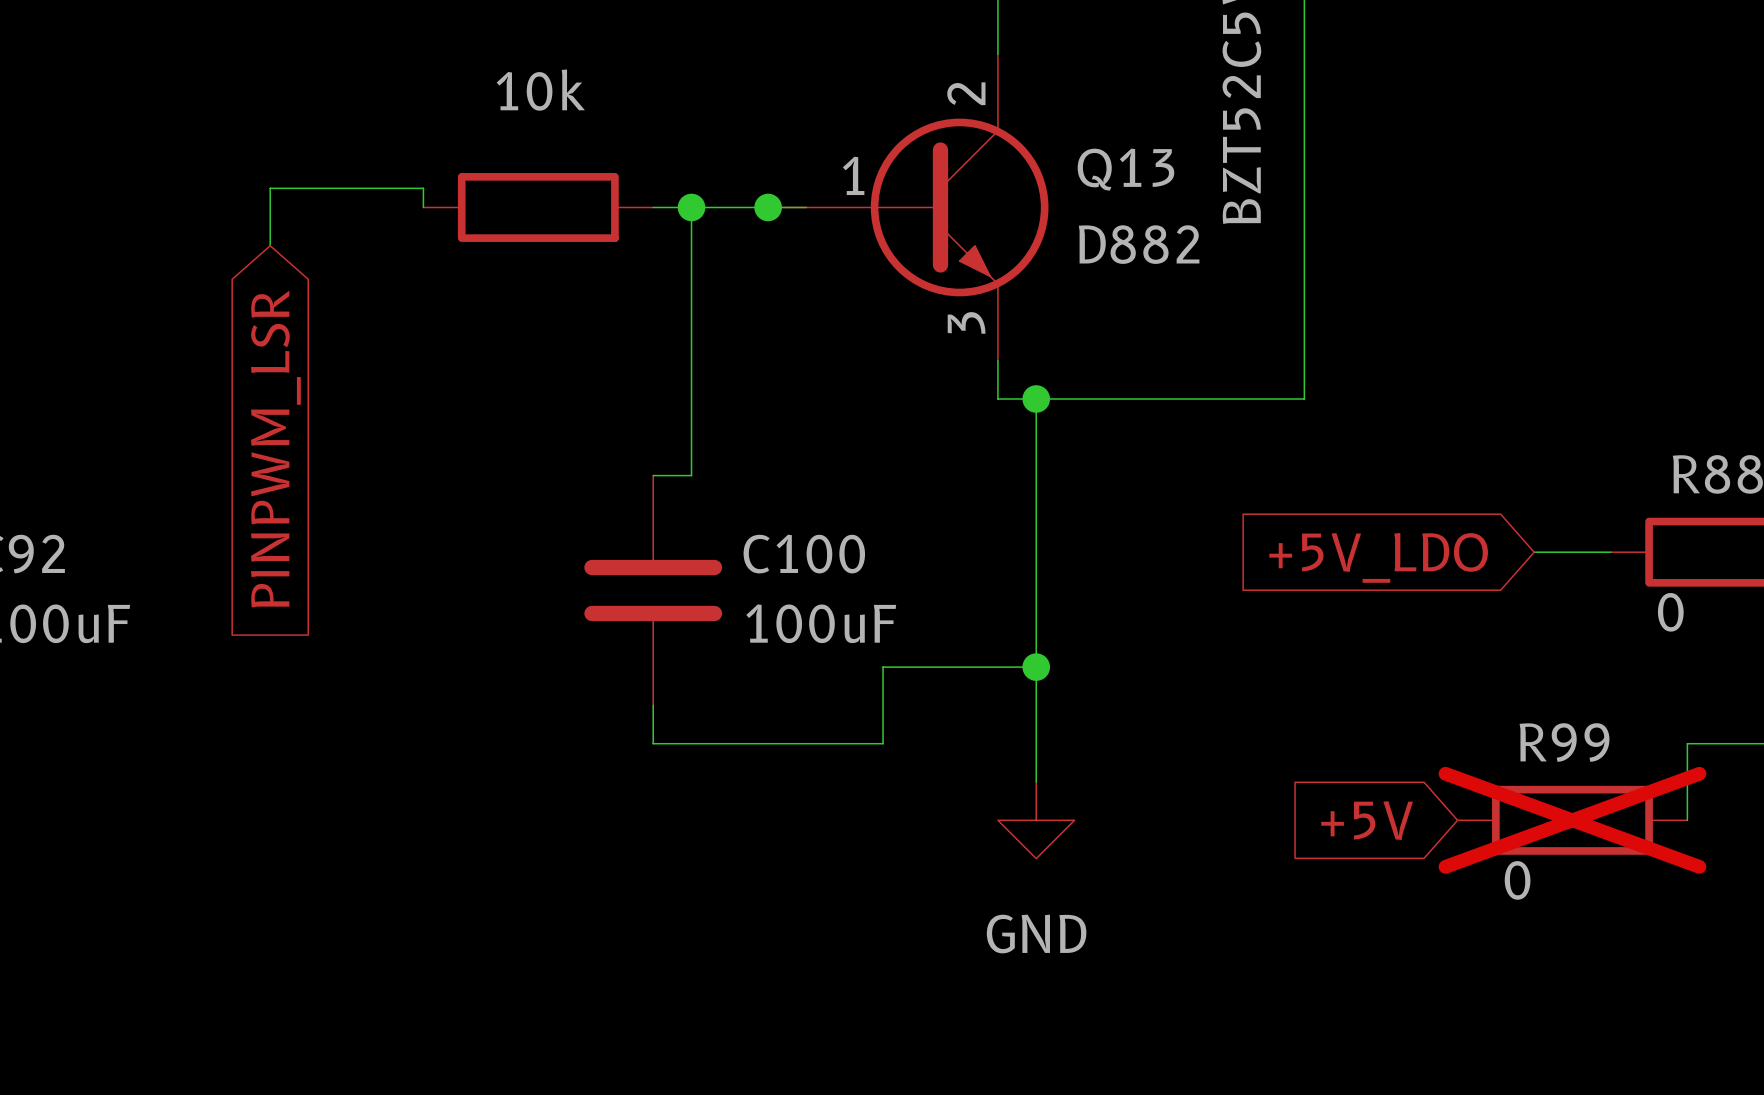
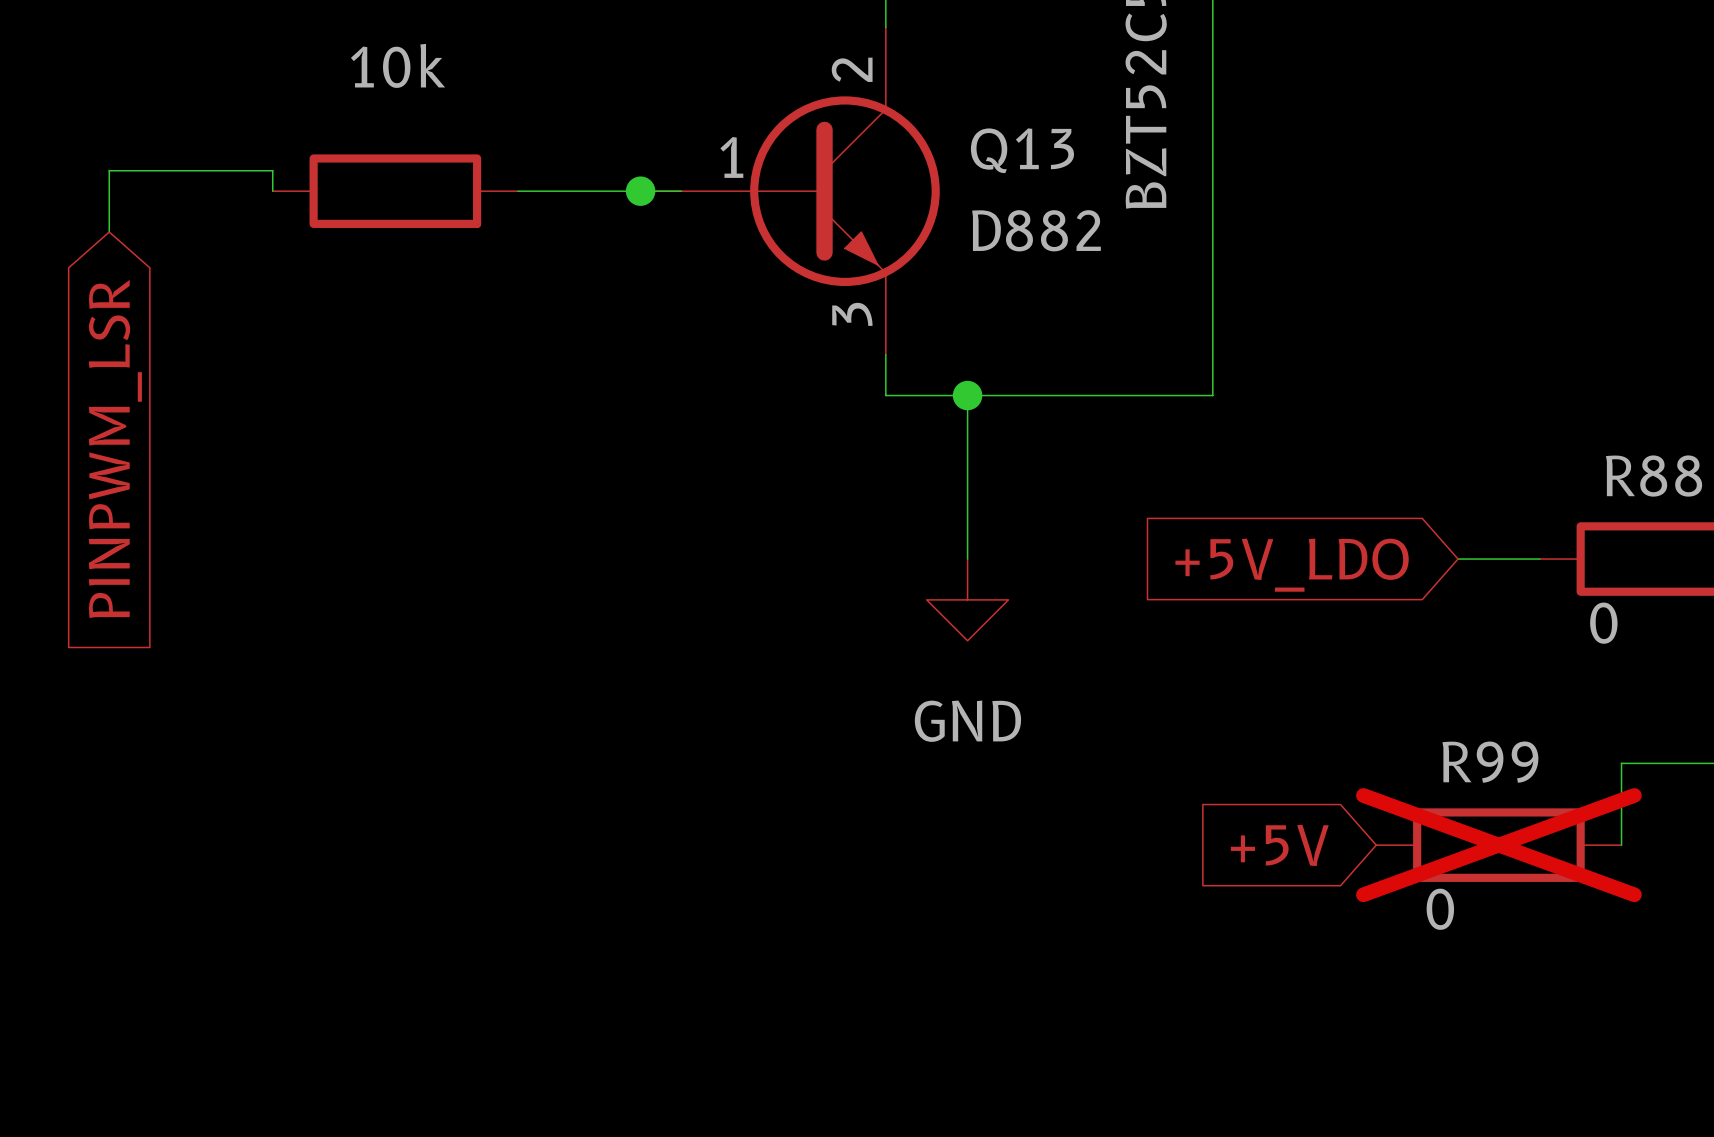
wire: (691, 207) (691, 475) (653, 475) -> none
junction: (691, 207) -> none
wire: (1036, 398) (1036, 782) -> none
junction position: (1036, 398) -> (967, 395)
wire: none -> (967, 395) (967, 559)
C100: 100uF (653, 590) -> none
wire: (1036, 667) (883, 667) (883, 743) (653, 743) (653, 705) -> none
junction: (1036, 667) -> none
power symbol position: GND (1036, 820) -> GND (967, 599)

